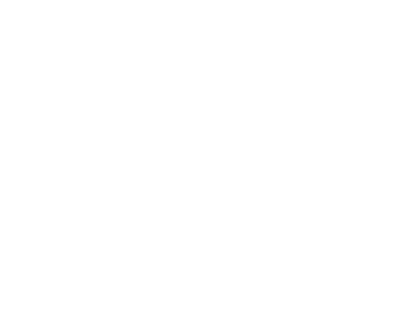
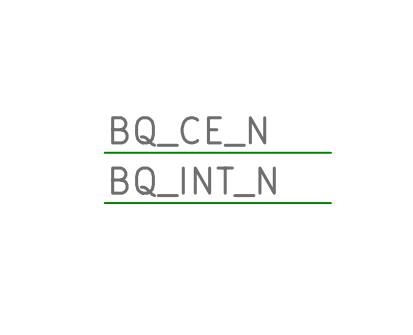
label: none -> BQ_CE_N (188, 131)
wire: none -> (104, 152) (330, 152)
label: none -> BQ_INT_N (193, 181)
wire: none -> (104, 203) (330, 203)

